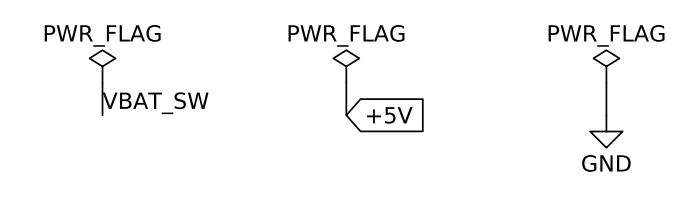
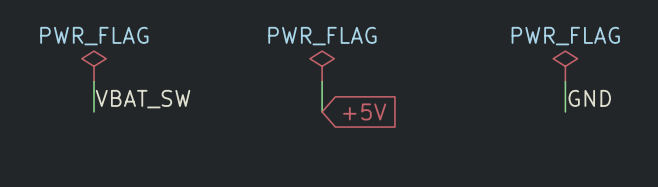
label: none -> GND (589, 98)
power symbol: GND (606, 131) -> none

